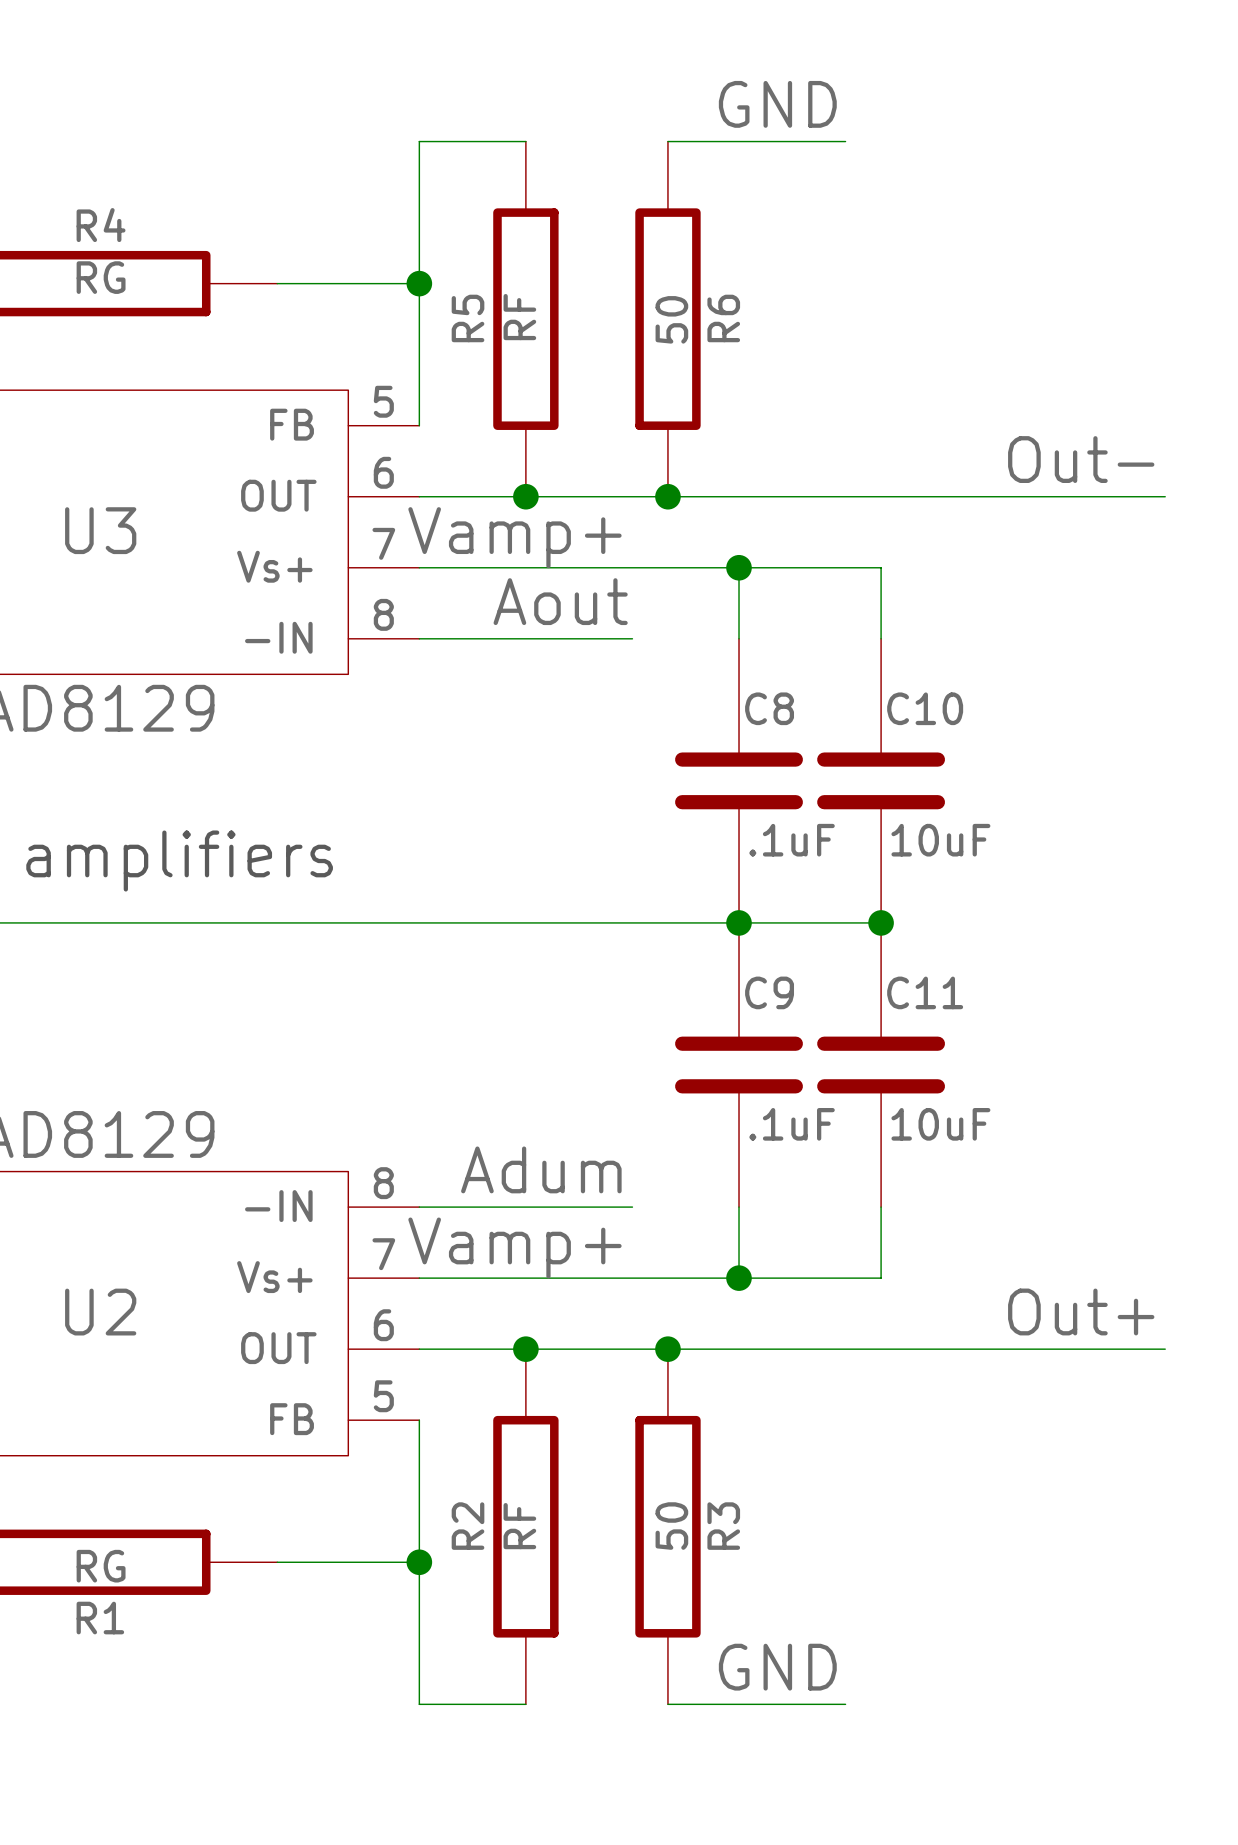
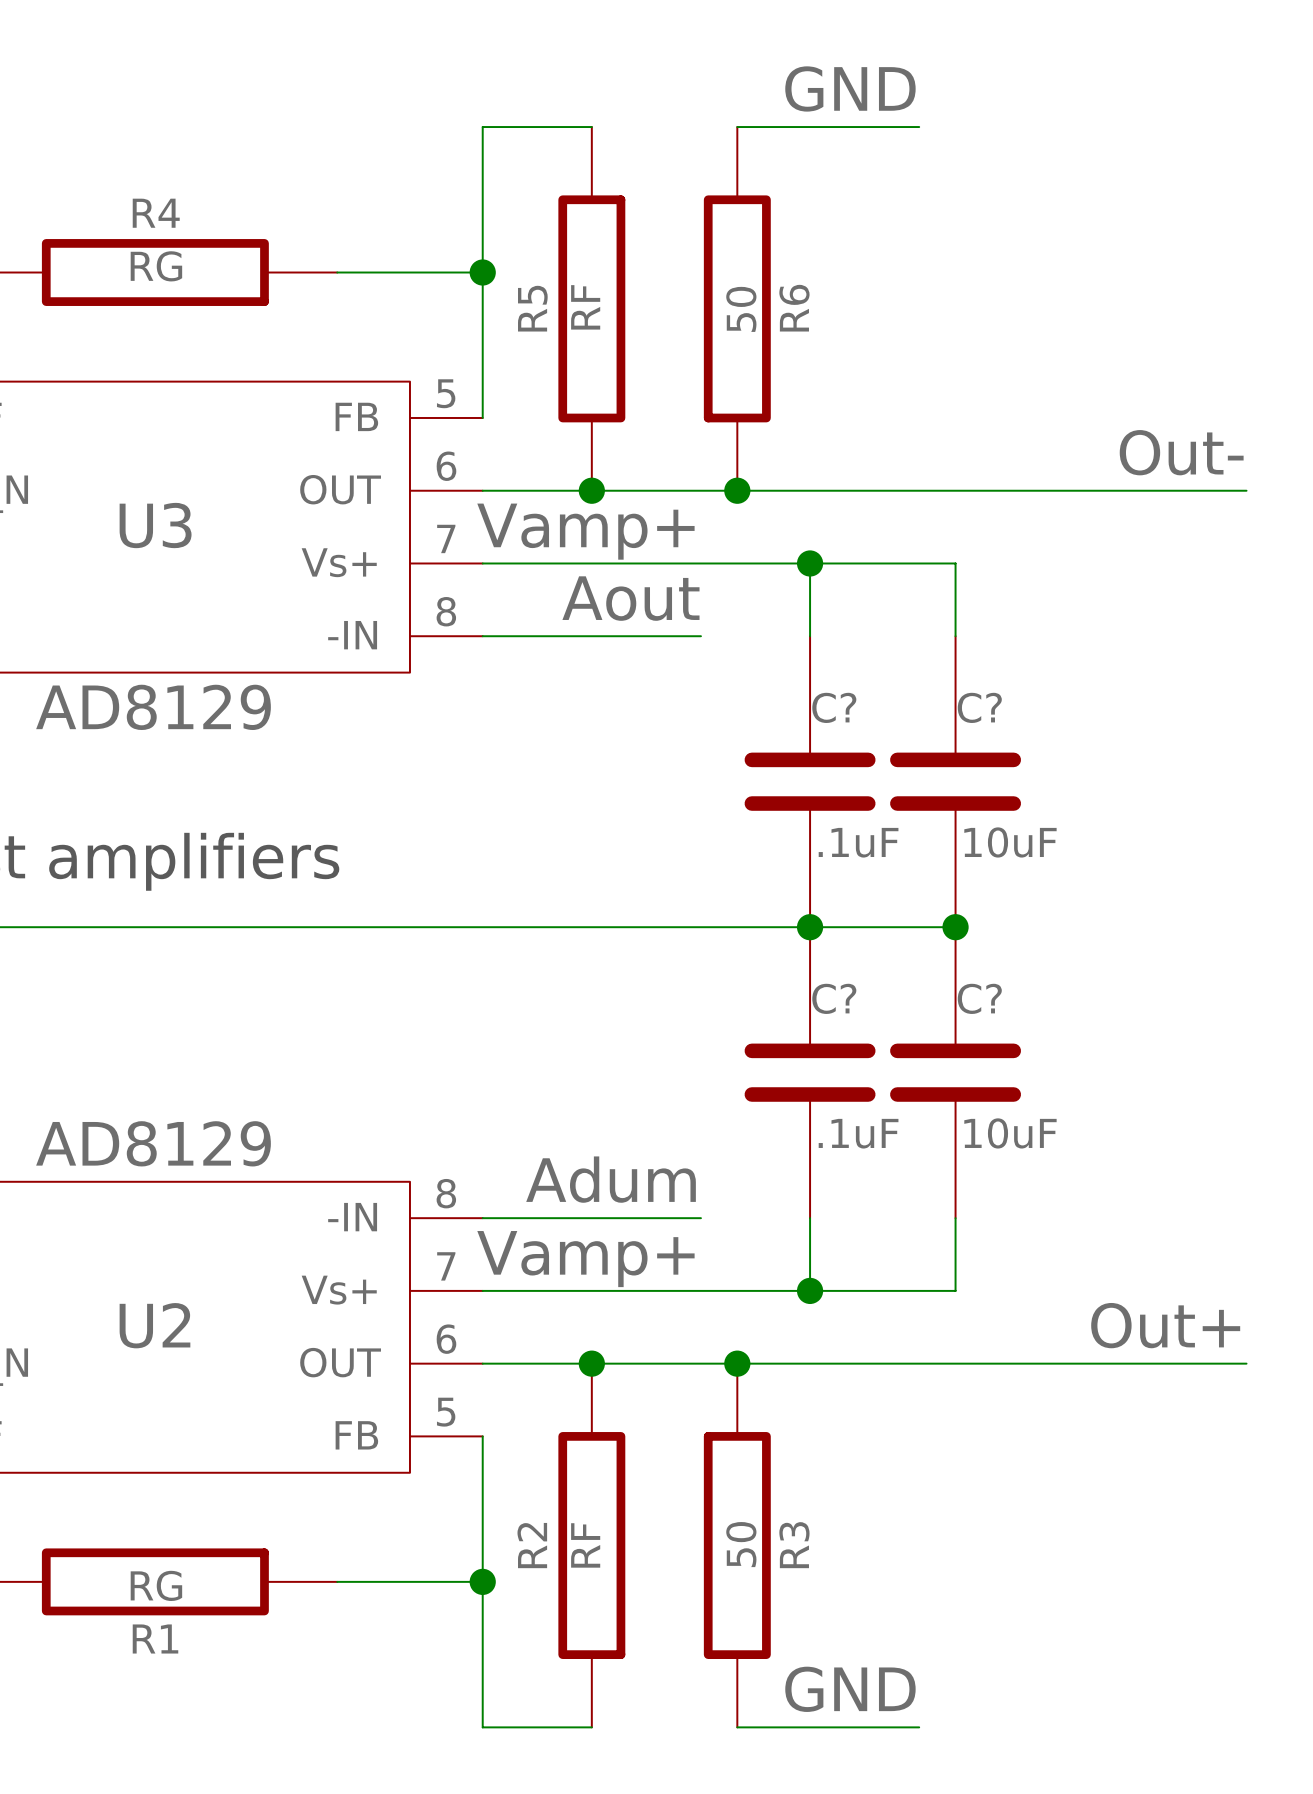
C8 name: C8 (769, 708) -> C? (834, 707)
C10 name: C10 (925, 708) -> C? (979, 707)
C9 name: C9 (769, 992) -> C? (834, 998)
C11 name: C11 (925, 992) -> C? (979, 998)

